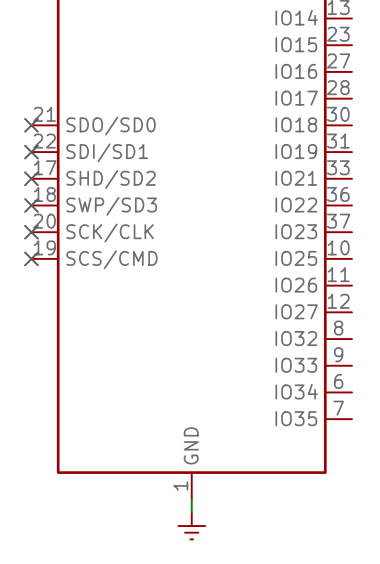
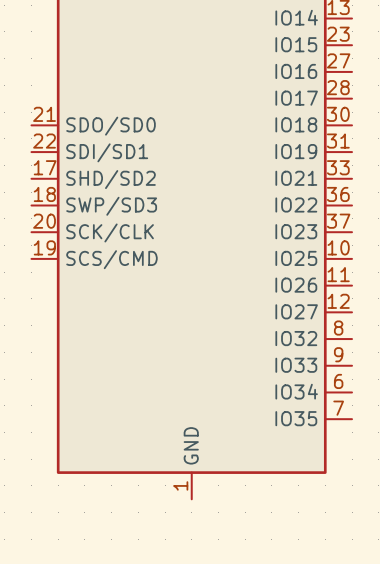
no-connect mark: (31, 125) -> none
no-connect mark: (31, 152) -> none
no-connect mark: (31, 178) -> none
no-connect mark: (31, 205) -> none
no-connect mark: (31, 232) -> none
no-connect mark: (31, 258) -> none
wire: (191, 499) (191, 512) -> none
power symbol: (191, 526) -> none

